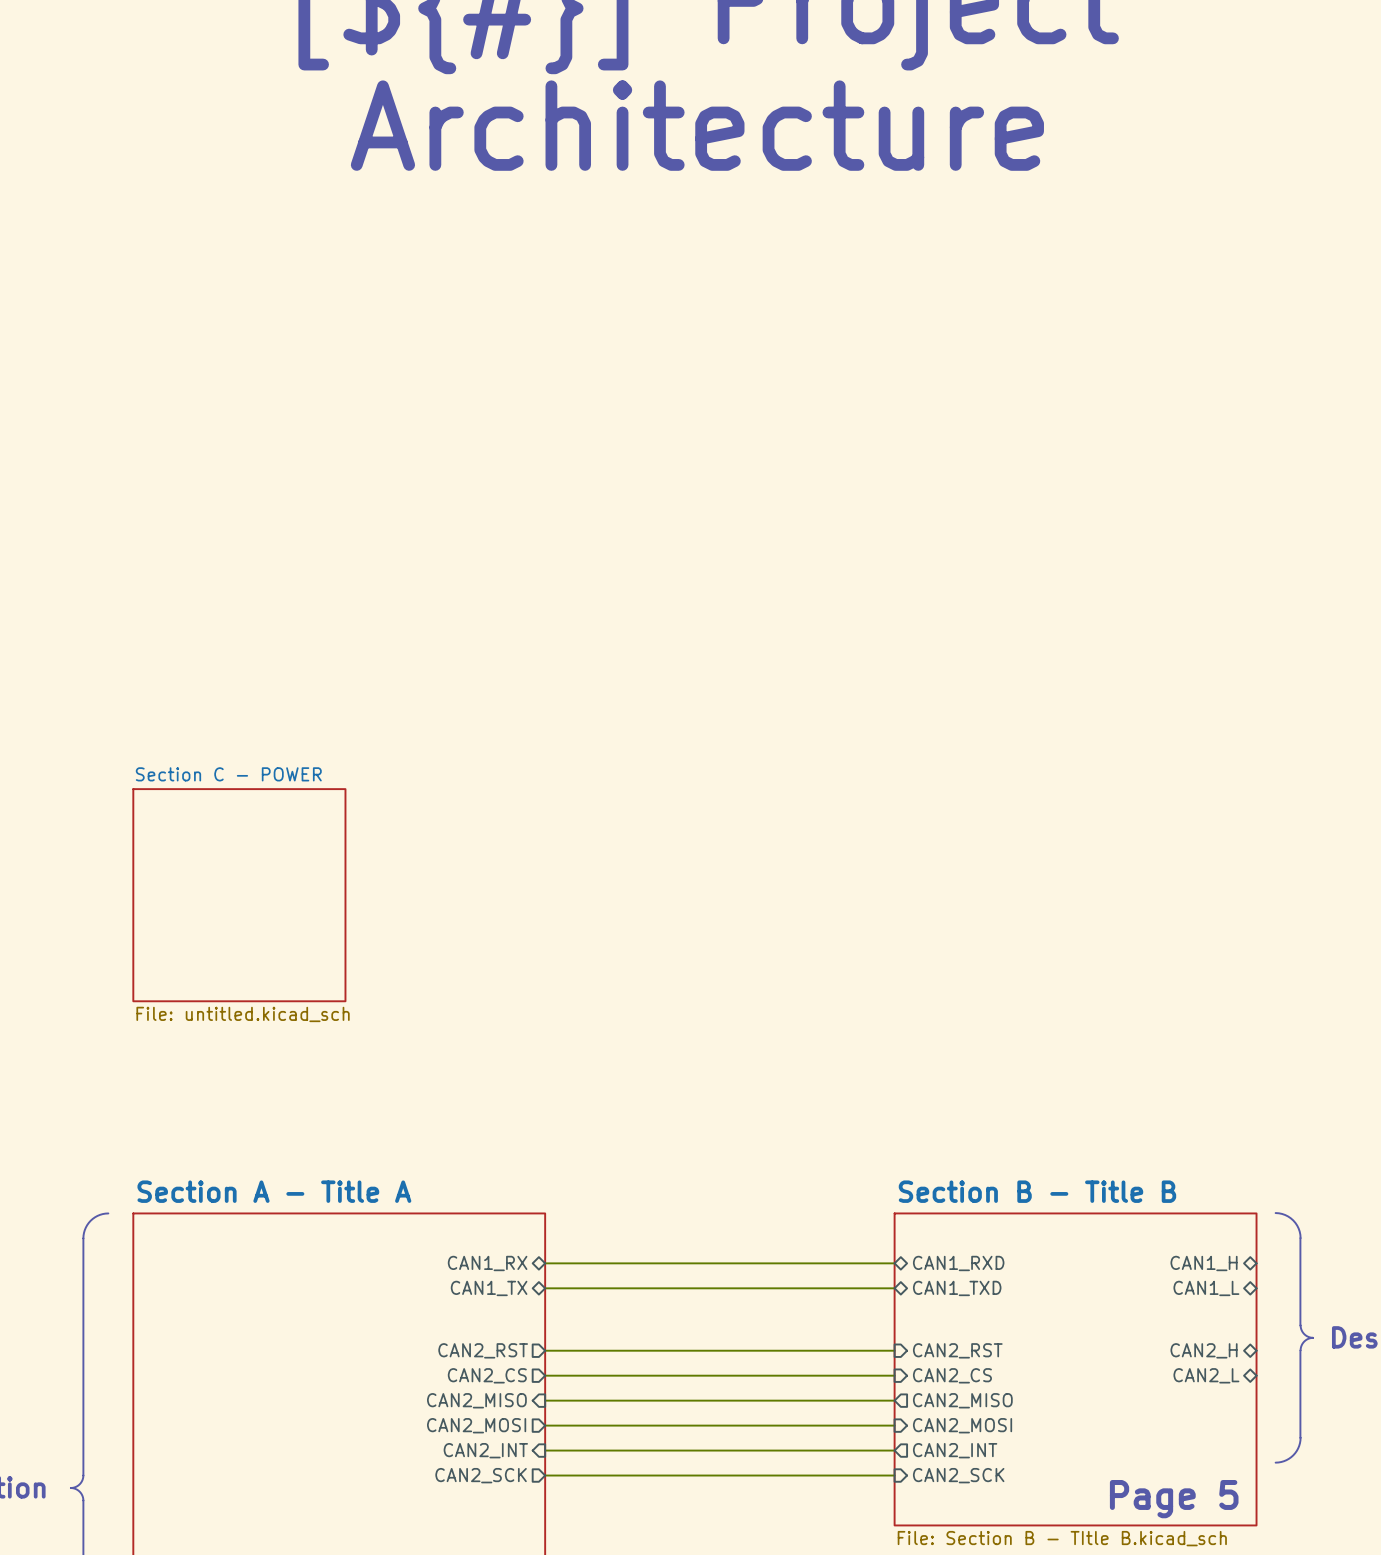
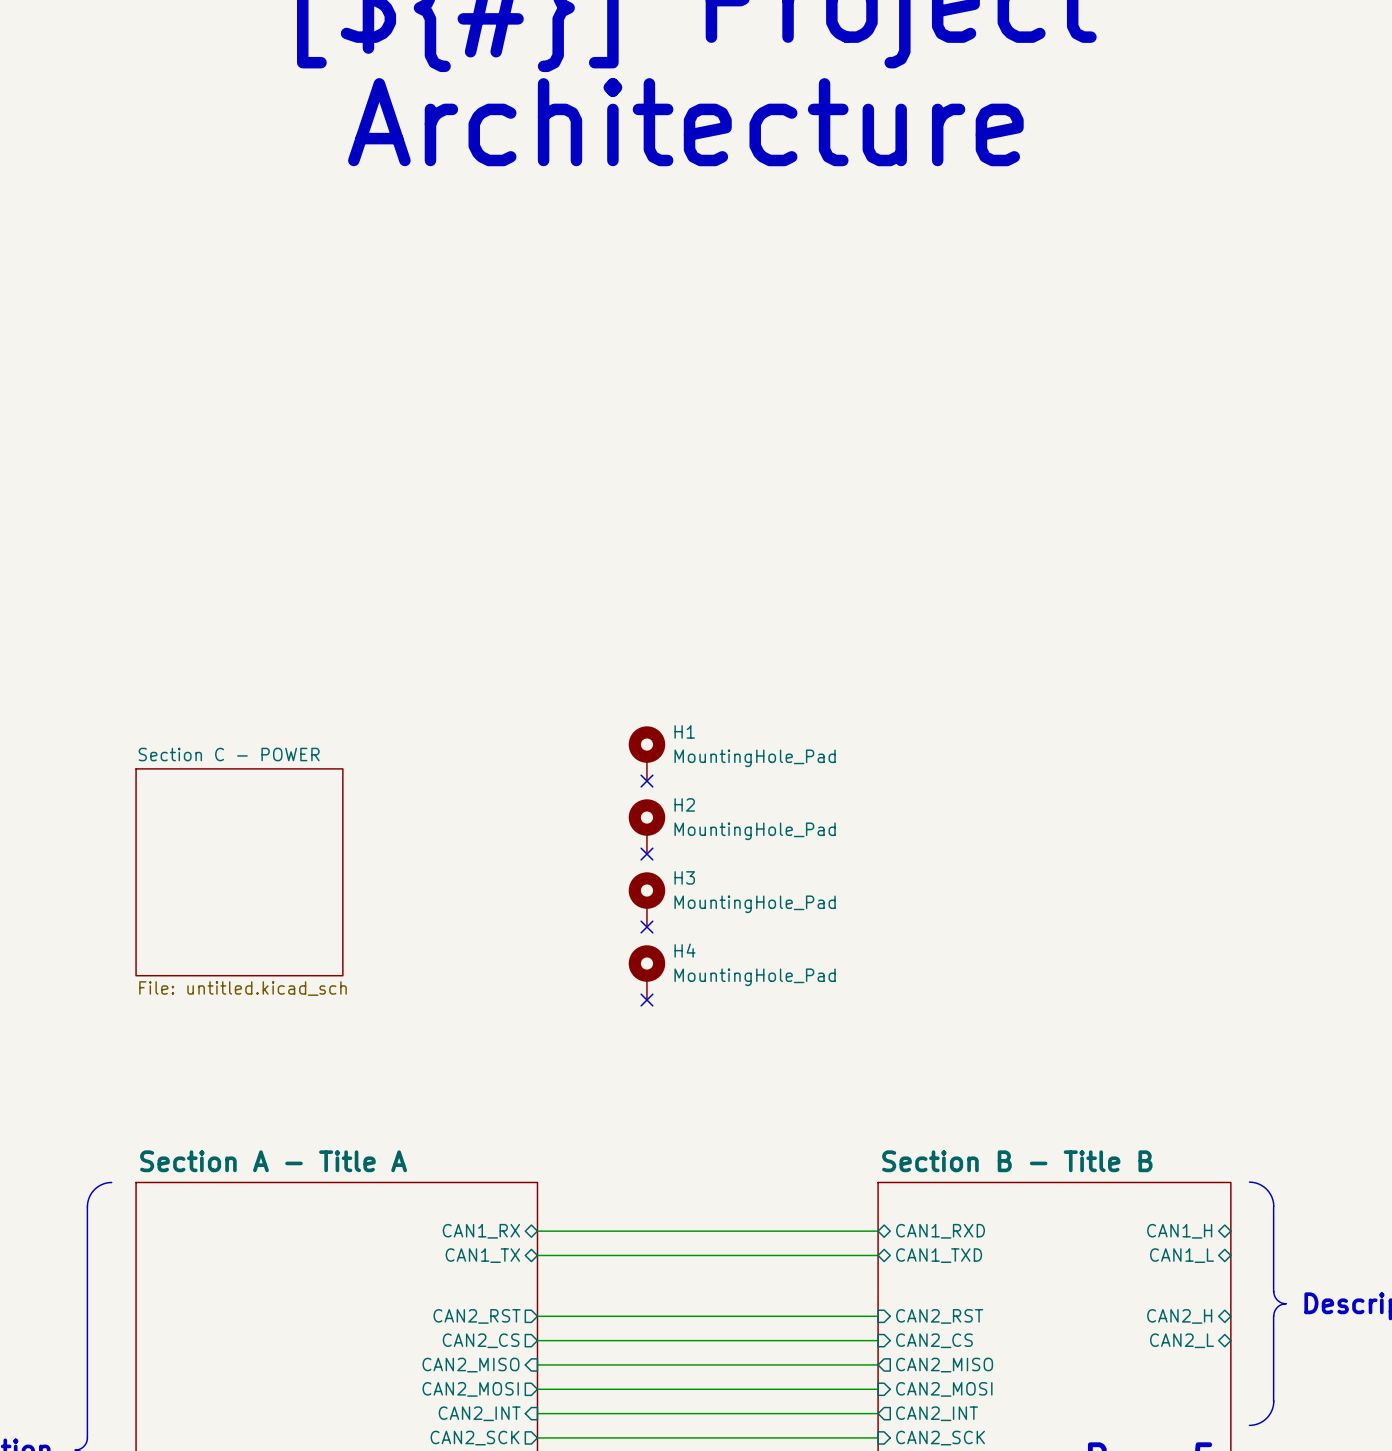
H1: none -> MountingHole_Pad (646, 753)
no-connect mark: none -> (646, 781)
H2: none -> MountingHole_Pad (646, 826)
no-connect mark: none -> (646, 854)
H3: none -> MountingHole_Pad (646, 899)
no-connect mark: none -> (646, 927)
H4: none -> MountingHole_Pad (646, 972)
no-connect mark: none -> (646, 1000)

